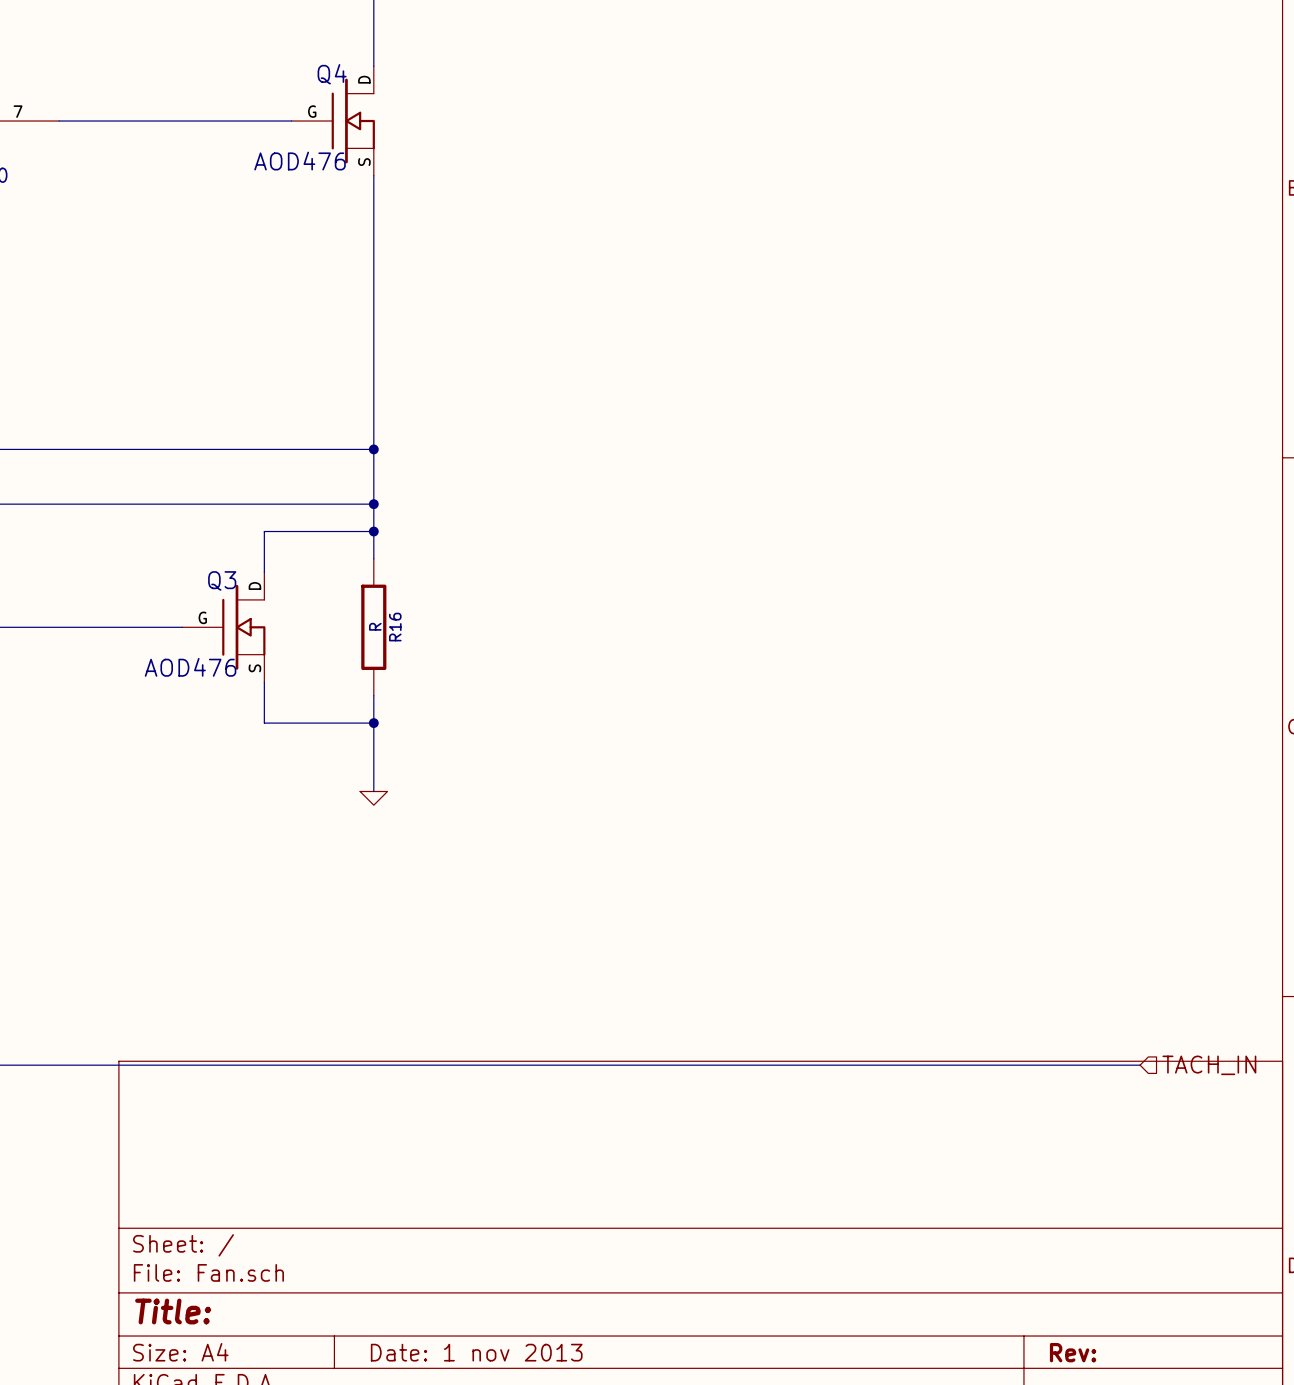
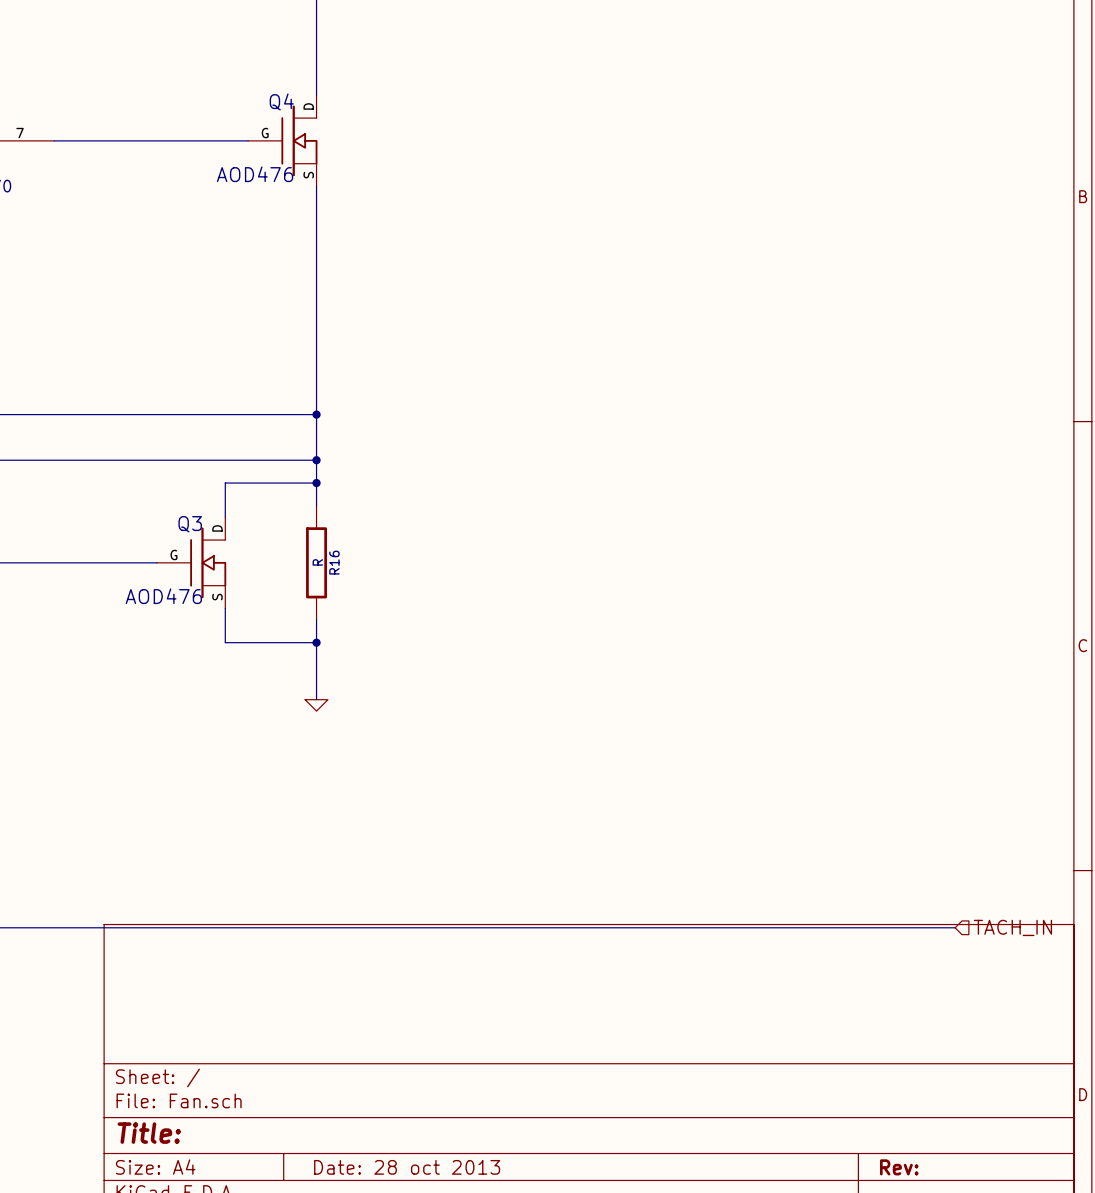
title block: Date: 1 nov 2013 (476, 1352) -> Date: 28 oct 2013 (407, 1167)

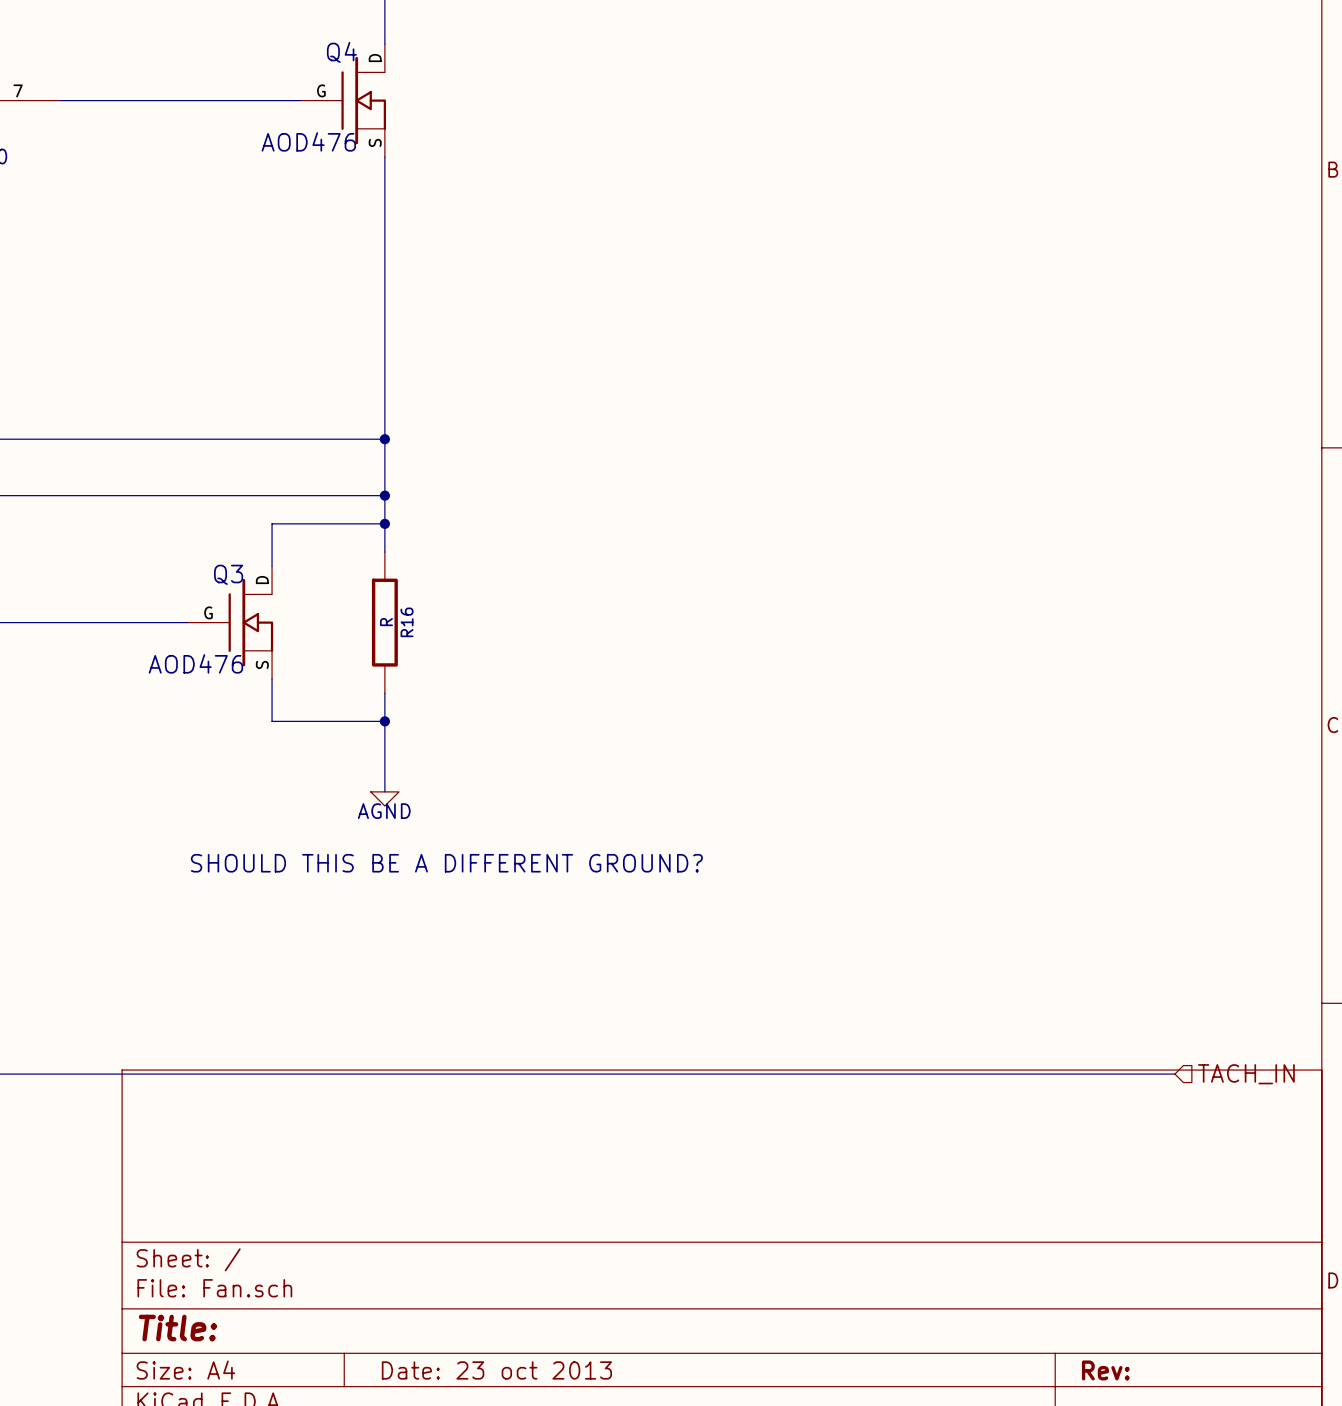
power symbol text: none -> AGND (384, 811)
text: none -> SHOULD THIS BE A DIFFERENT GROUND? (446, 863)
title block: Date: 28 oct 2013 (407, 1167) -> Date: 23 oct 2013 (496, 1370)

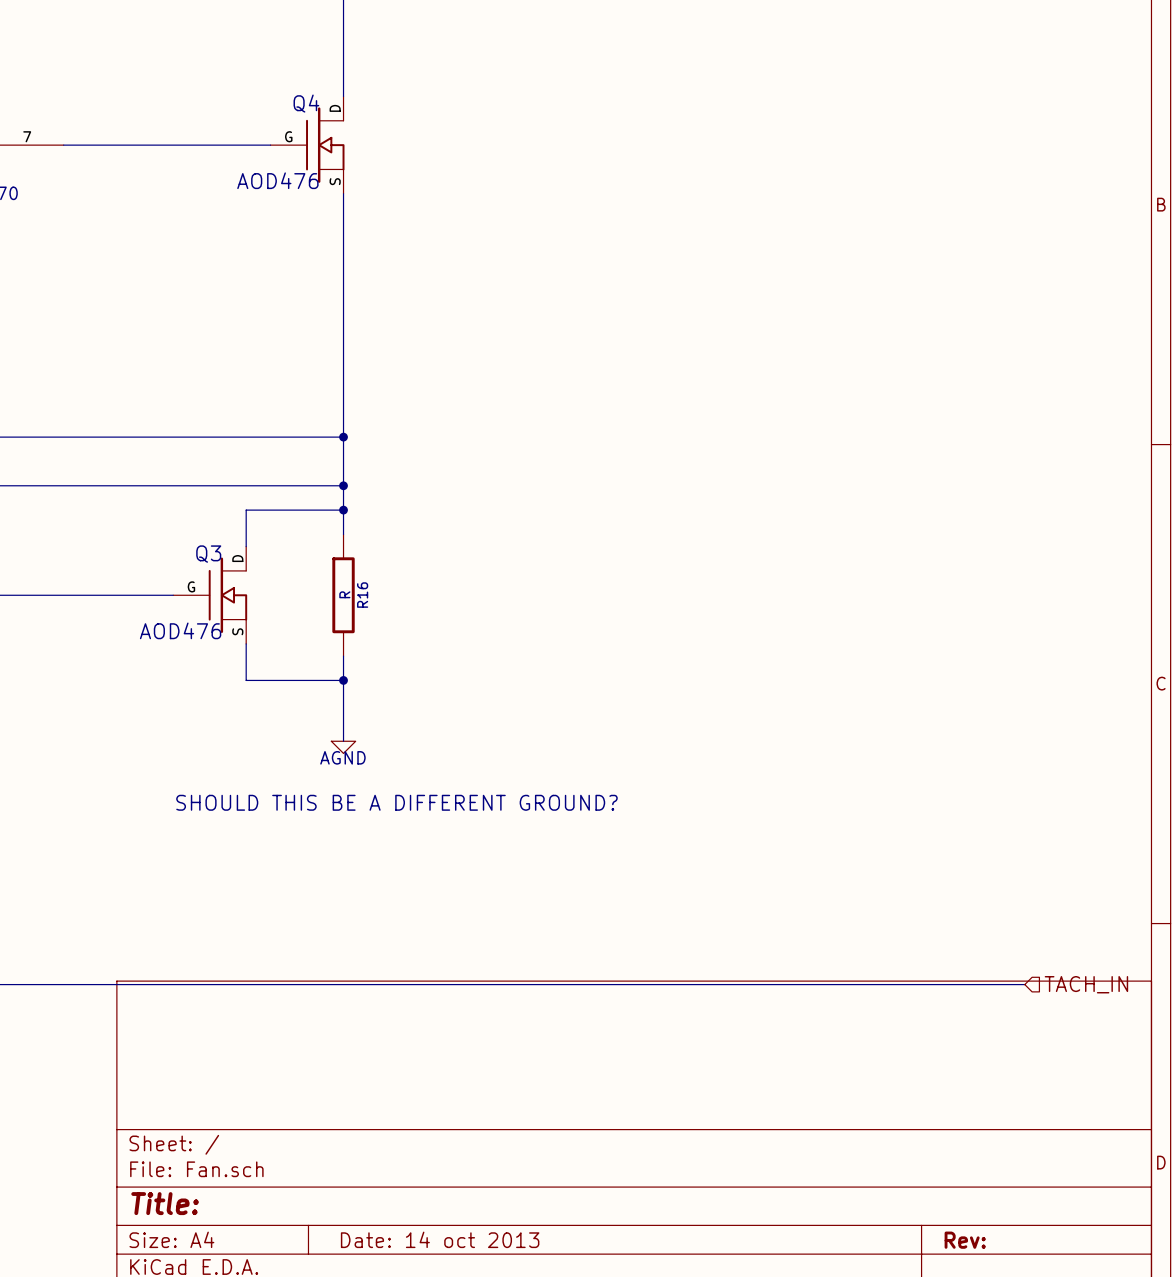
title block: Date: 23 oct 2013 (496, 1370) -> Date: 14 oct 2013 (440, 1239)

